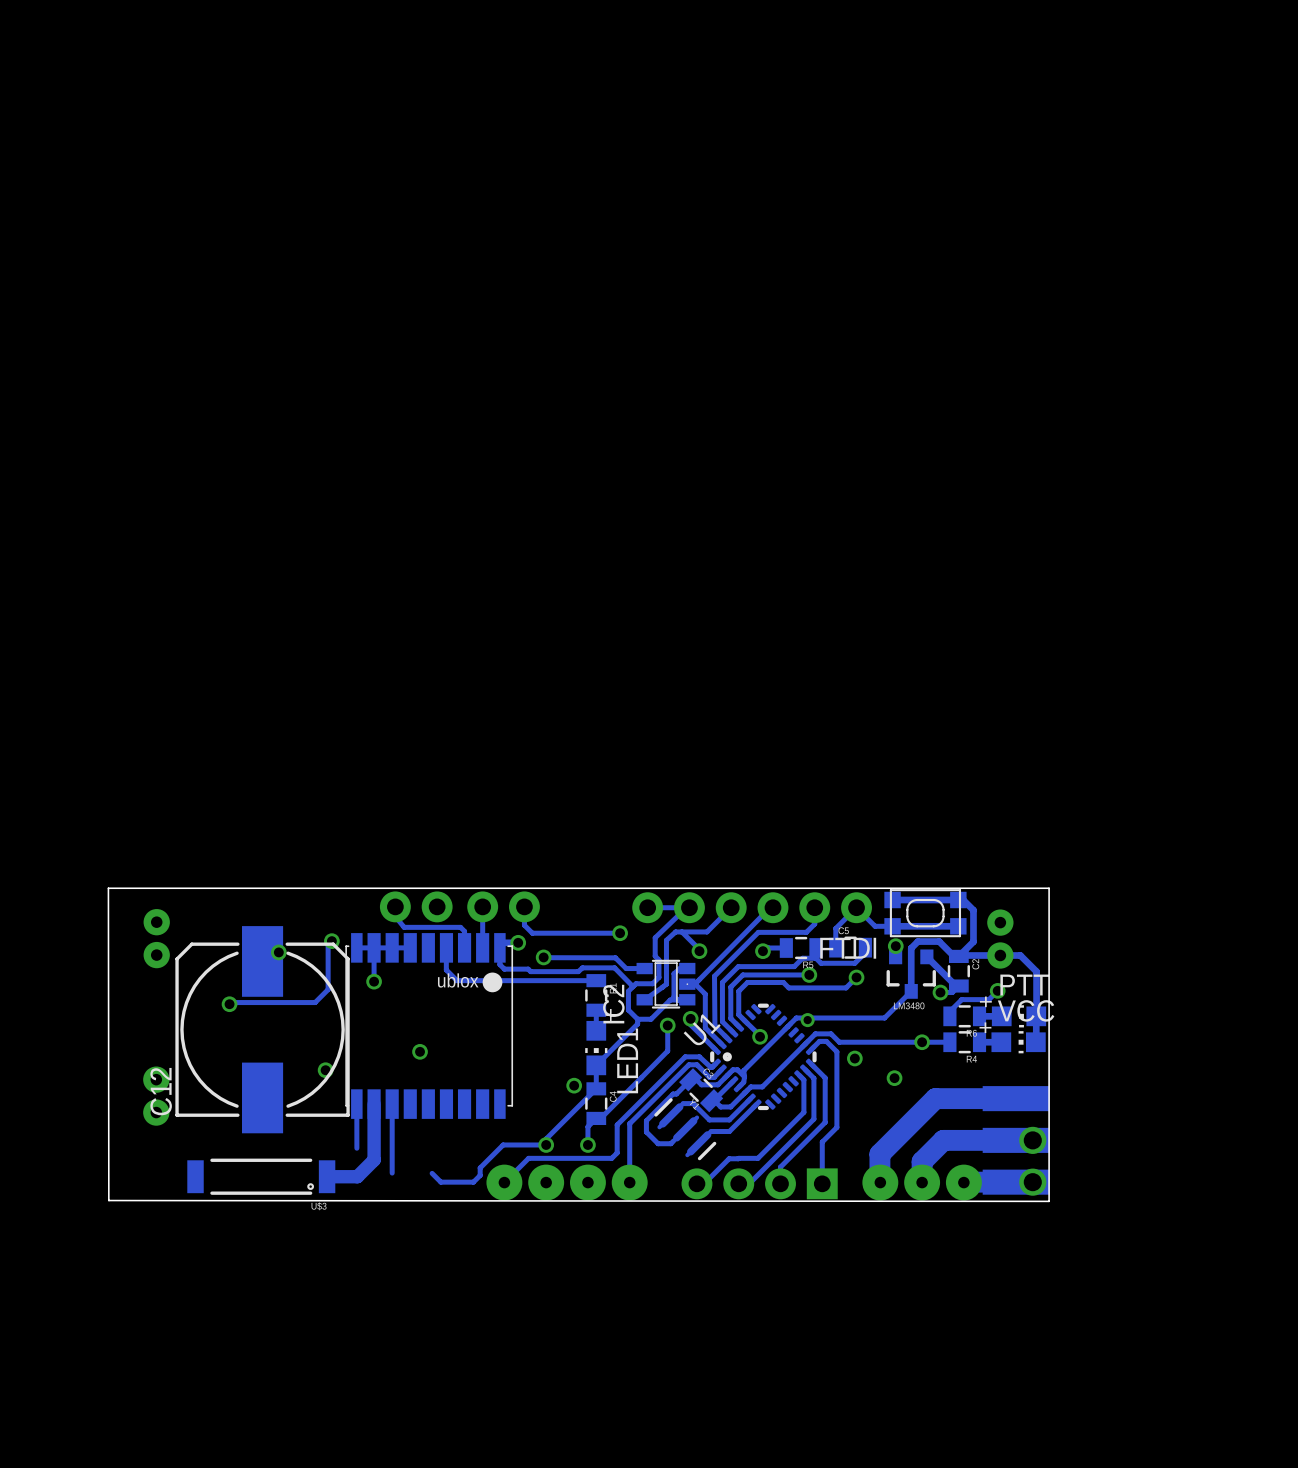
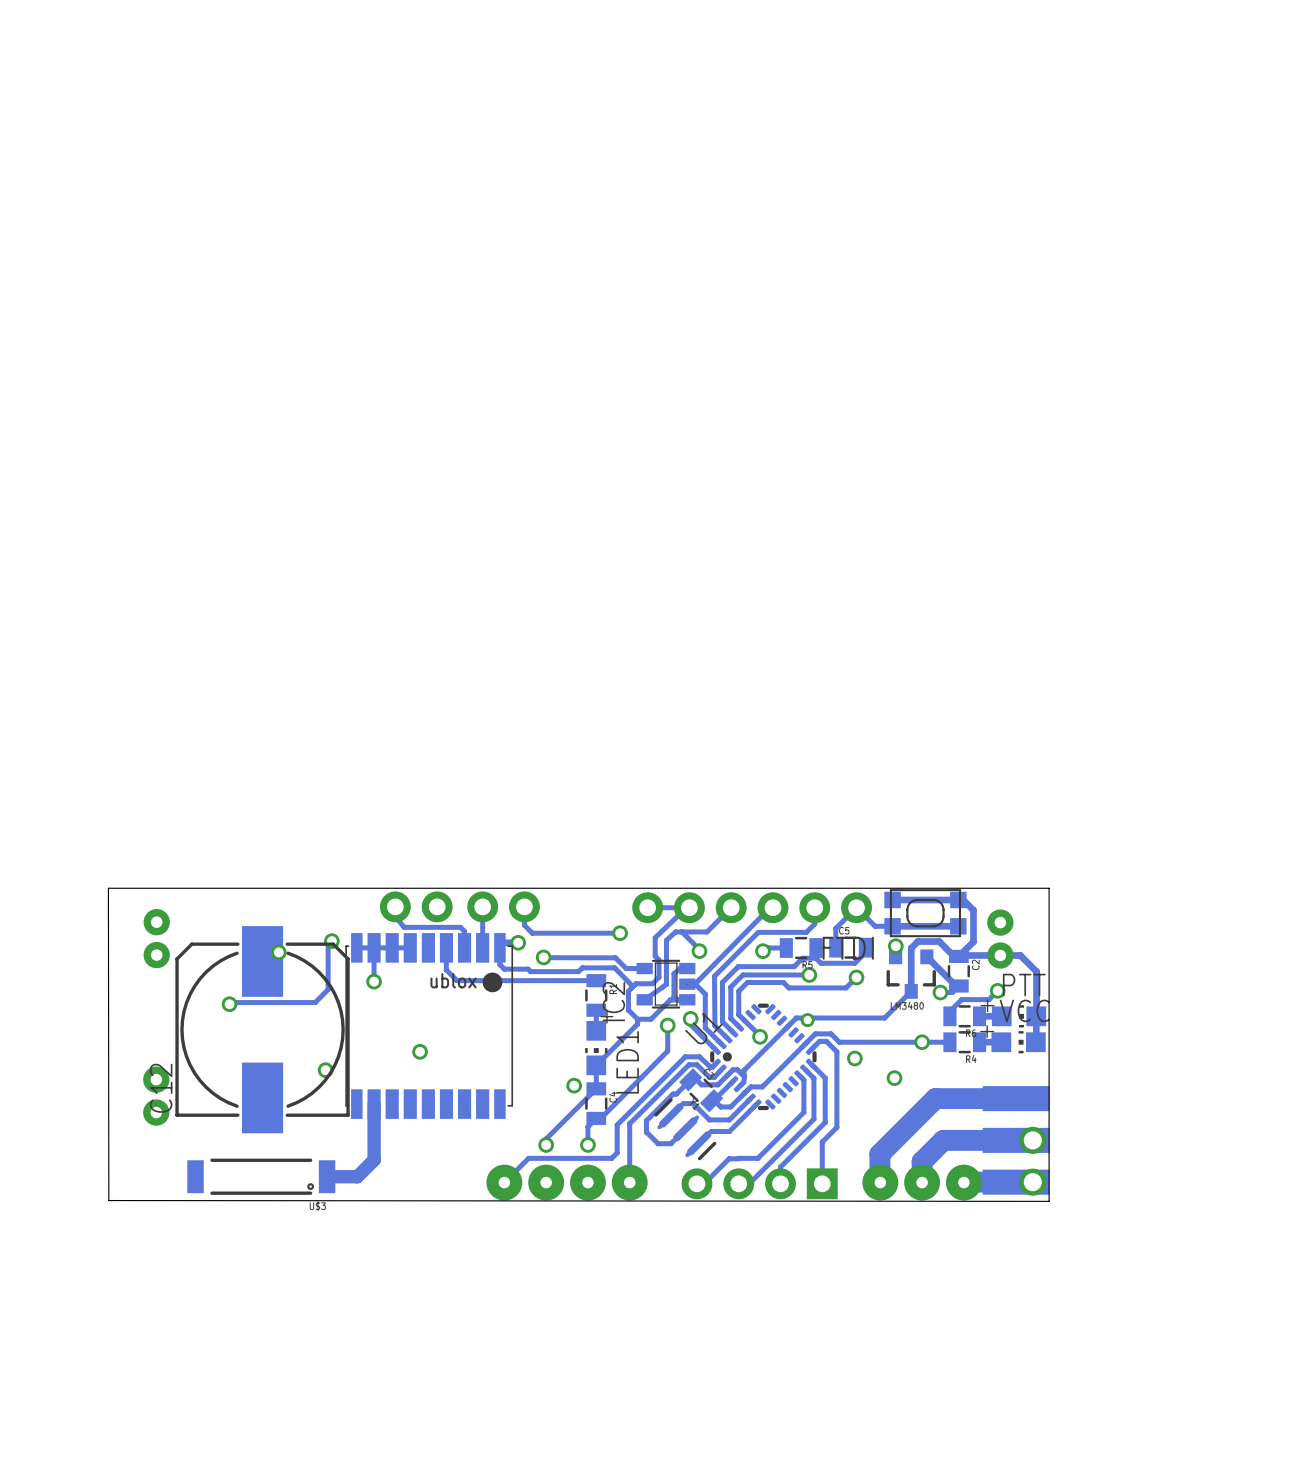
track: (356, 1104) (356, 1148) -> none
track: (392, 1104) (392, 1173) -> none
track: (546, 1144) (503, 1144) (480, 1167) (480, 1175) (473, 1182) (440, 1182) (432, 1173) -> none

